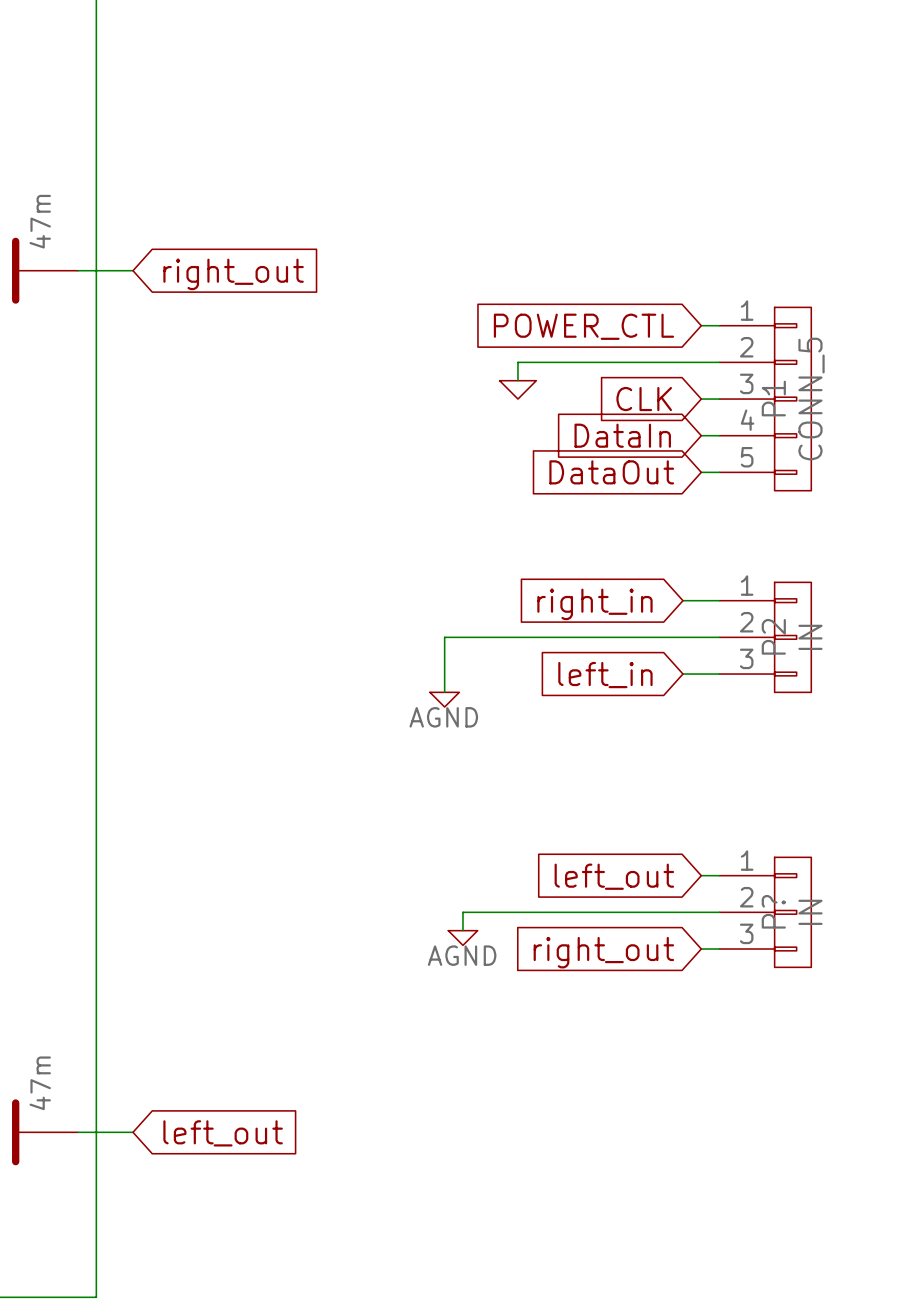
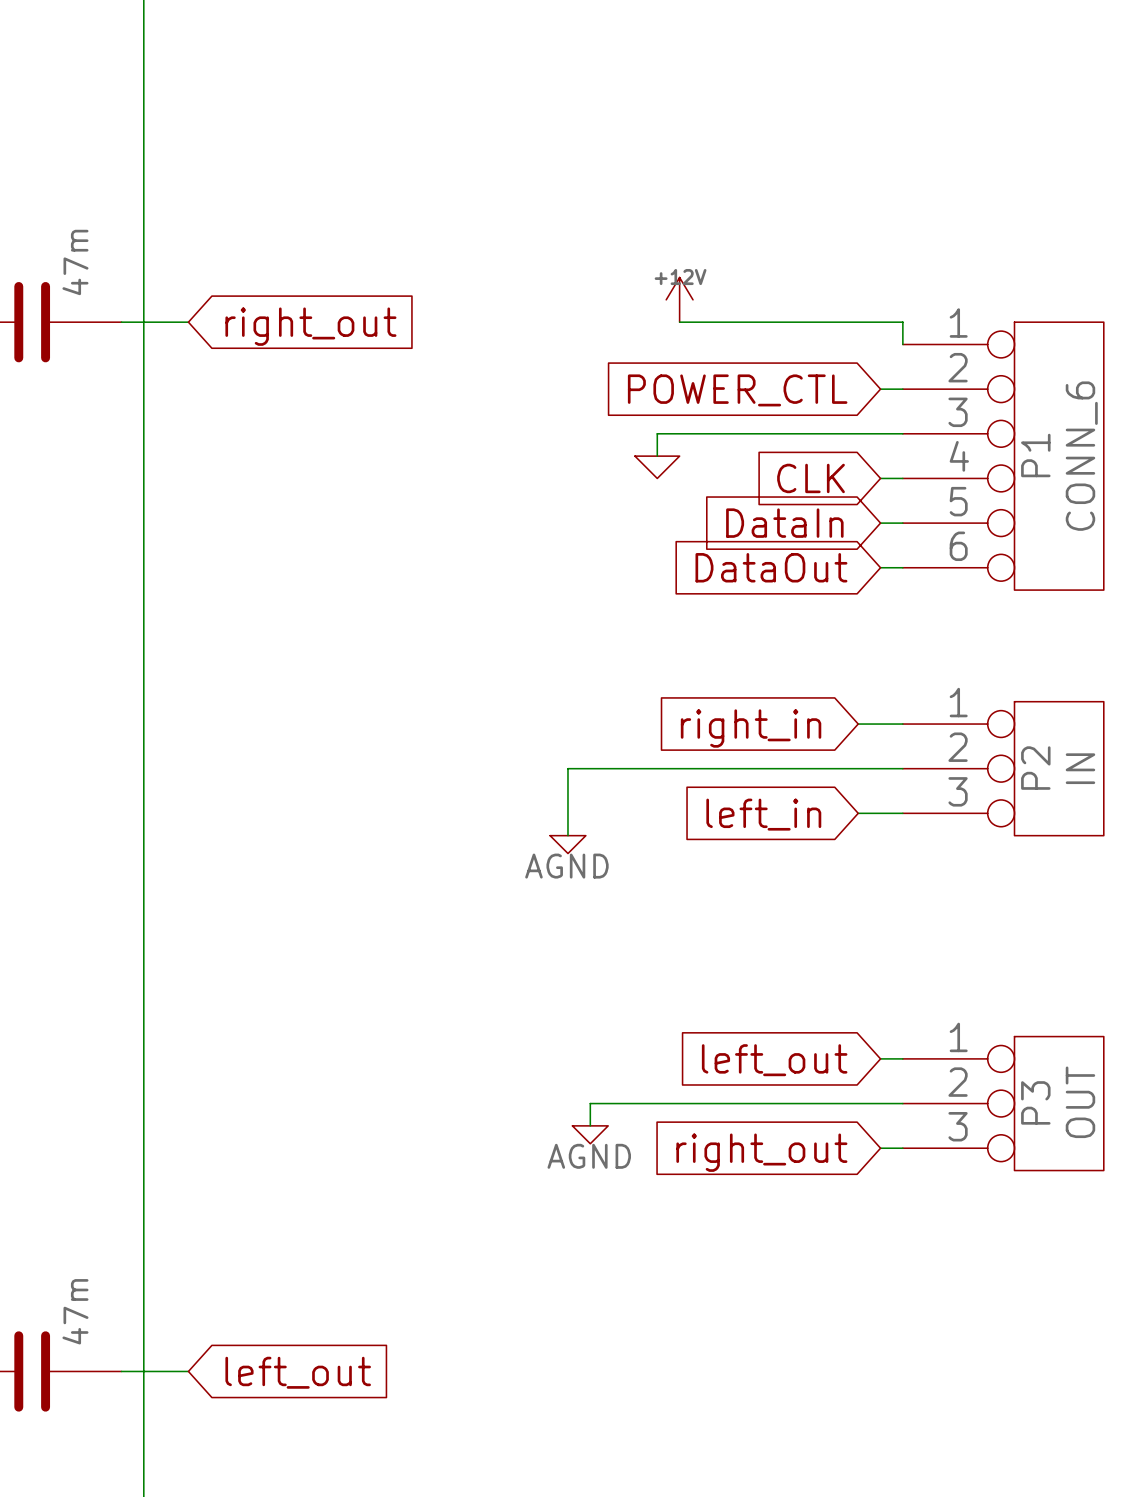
power symbol: none -> +12V (679, 299)
wire: none -> (679, 322) (902, 322) (902, 344)
P1 symbol: [719, 307, 812, 491] -> [902, 322, 1104, 591]
P1 value: CONN_5 (811, 399) -> CONN_6 (1081, 456)
P2 symbol: [719, 582, 812, 693] -> [902, 701, 1104, 836]
P?: IN (765, 912) -> none
P3: none -> OUT (1003, 1103)

